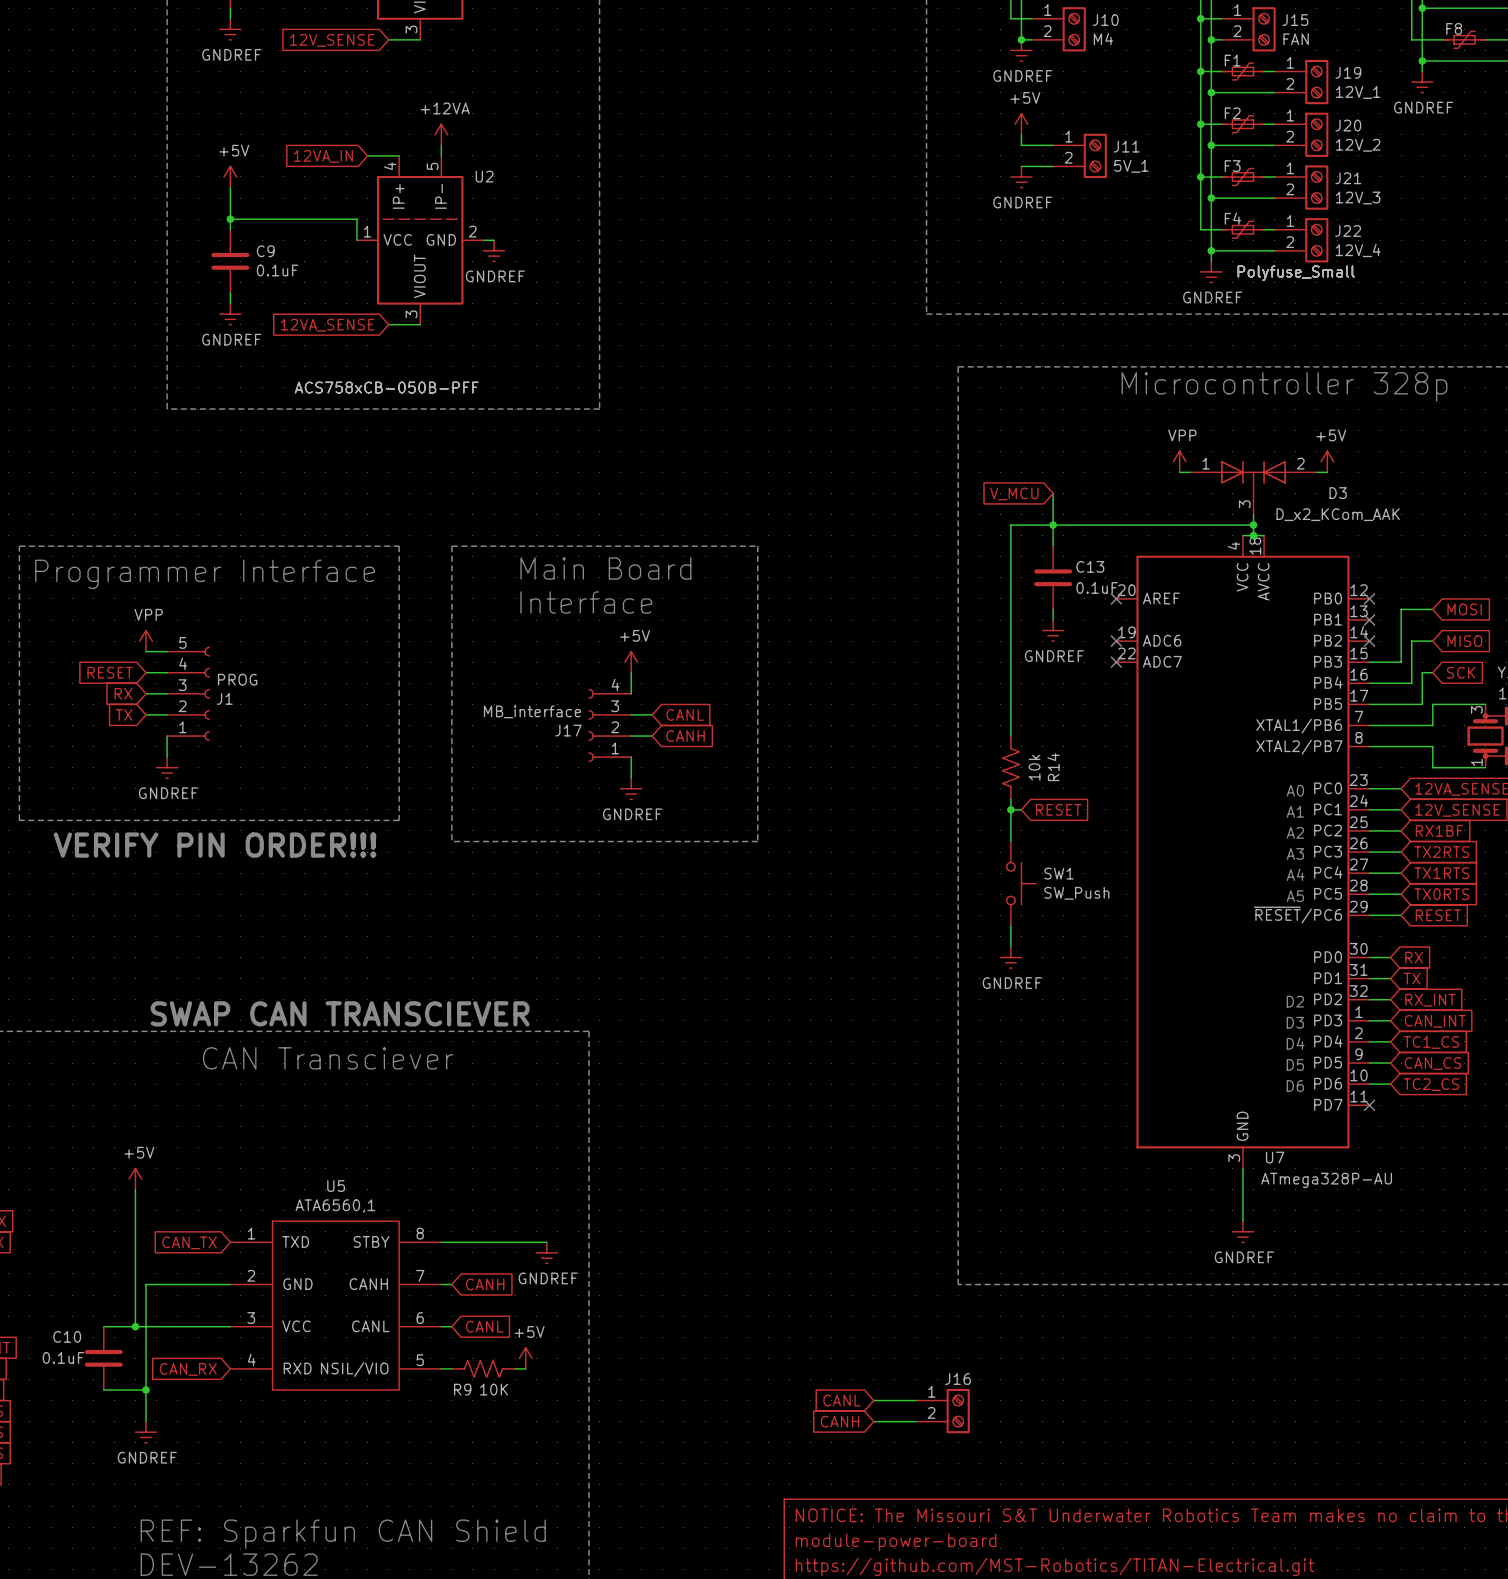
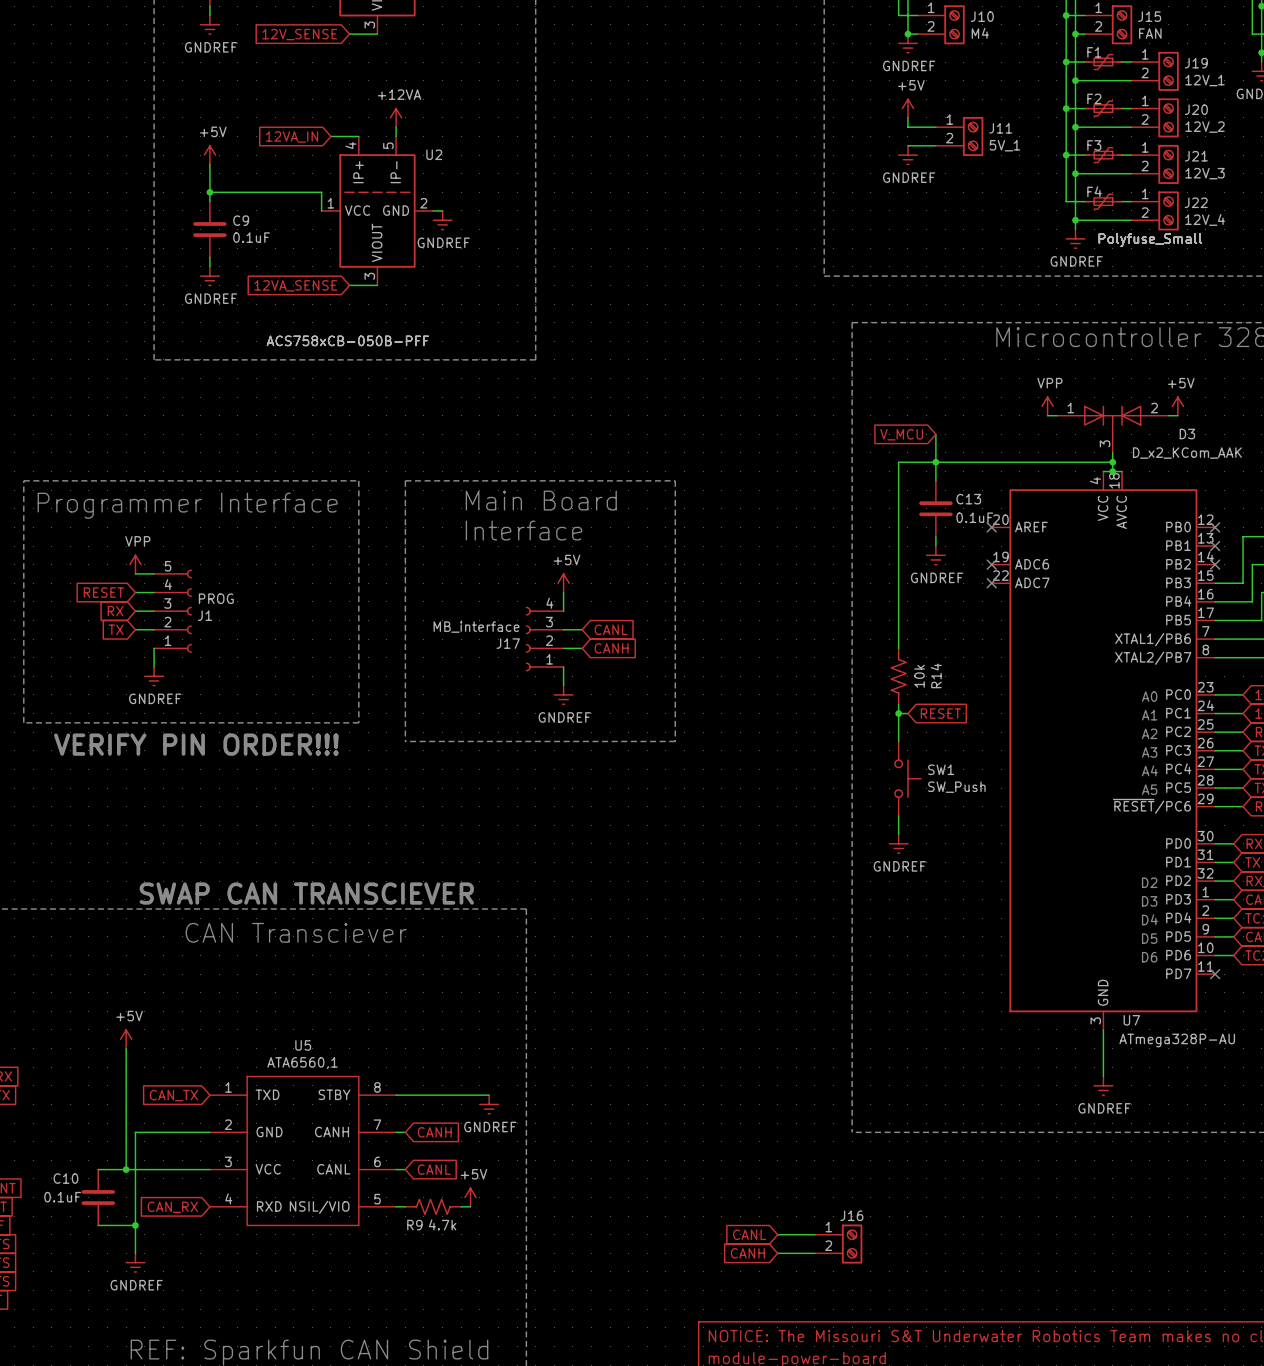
R9 value: 10K (494, 1389) -> 4.7k (442, 1224)

